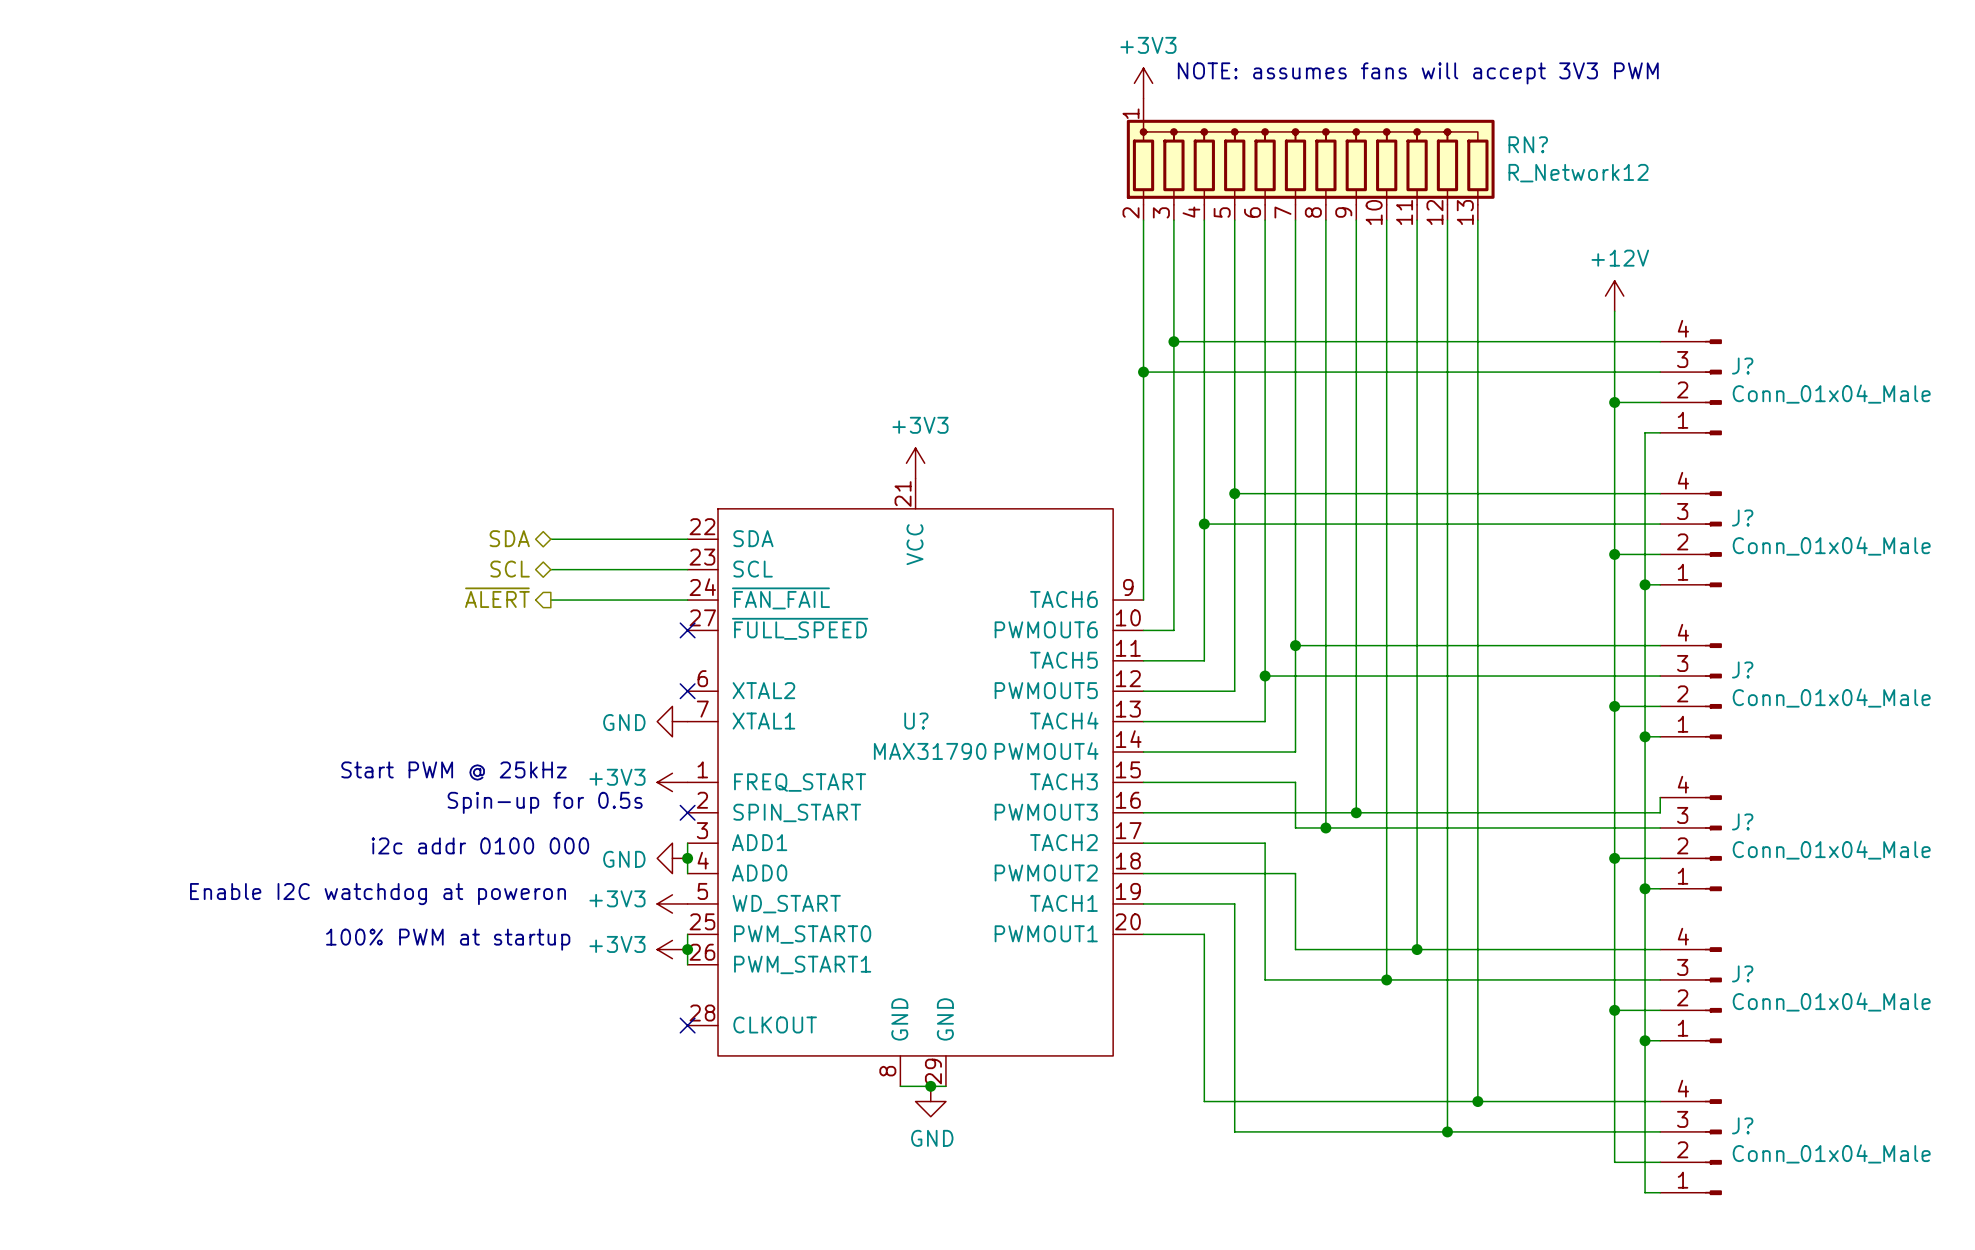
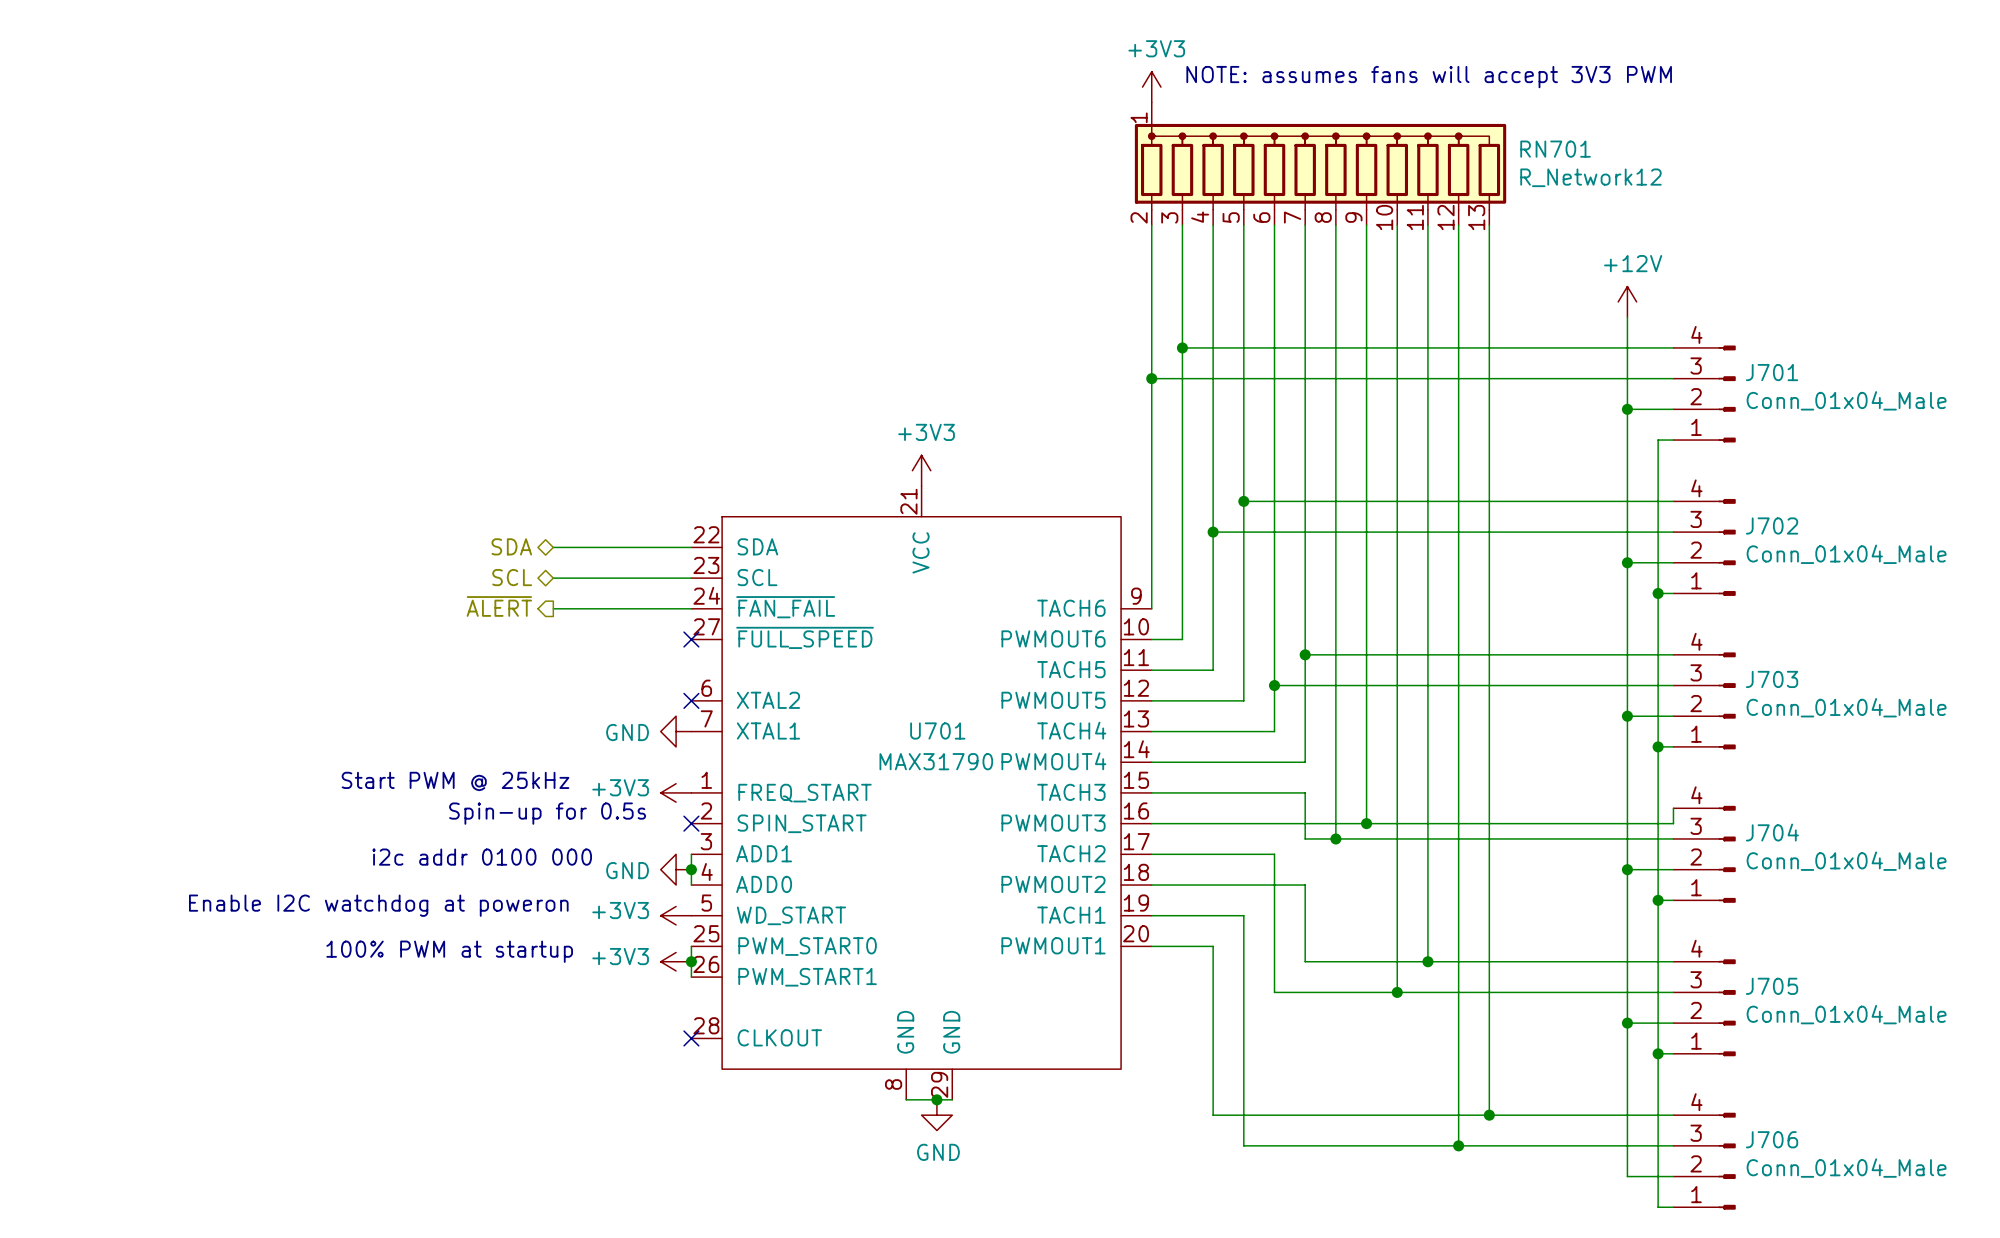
RN? name: RN? (1528, 144) -> RN701 (1555, 149)
J? name: J? (1742, 366) -> J701 (1772, 372)
J? name: J? (1742, 518) -> J702 (1772, 525)
J? name: J? (1742, 669) -> J703 (1772, 679)
U? name: U? (916, 721) -> U701 (937, 730)
J? name: J? (1742, 821) -> J704 (1772, 832)
J? name: J? (1742, 973) -> J705 (1772, 986)
J? name: J? (1742, 1125) -> J706 (1772, 1139)

